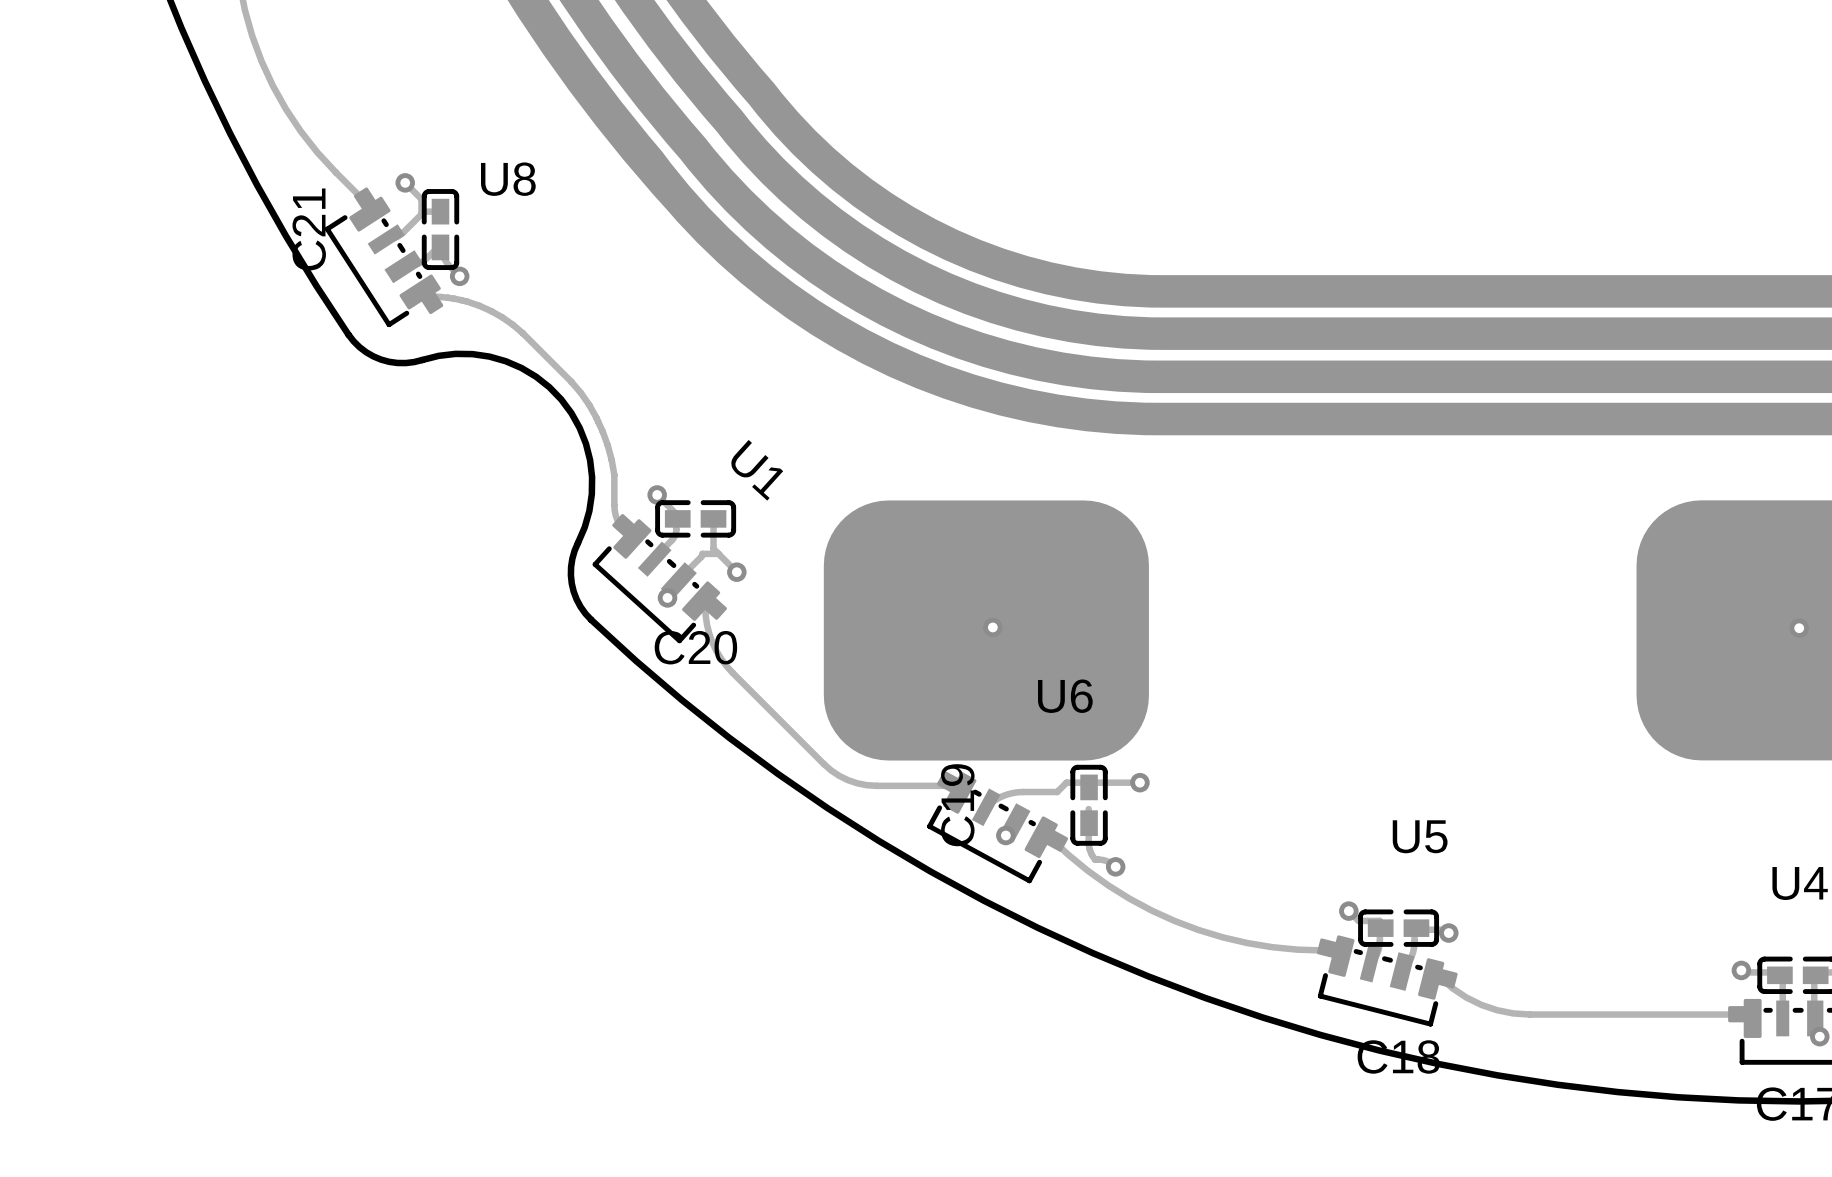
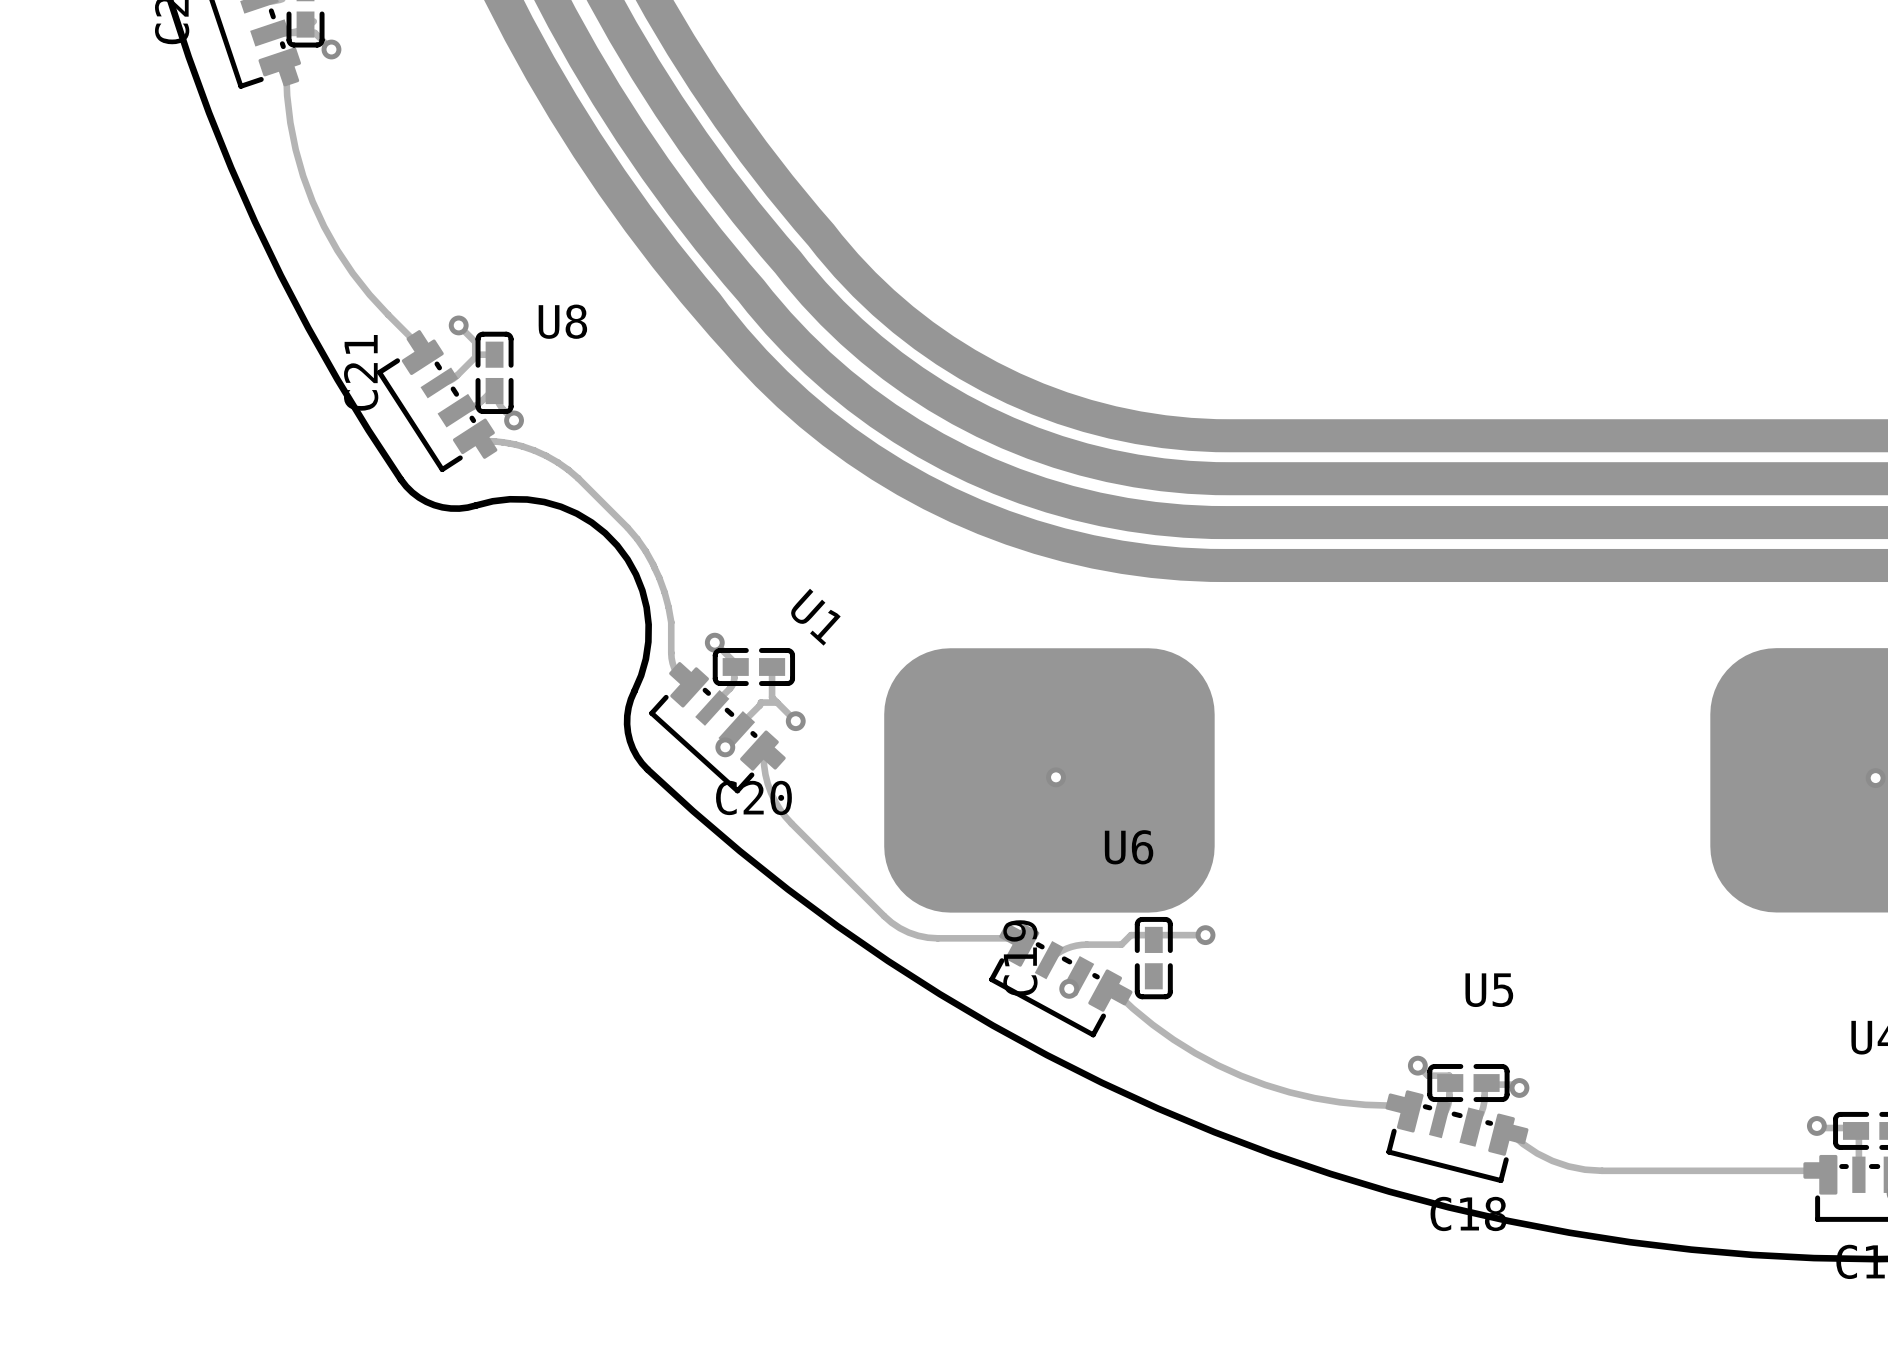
track: (1088, 809) (1088, 844) (1091, 854) (1094, 859) (1107, 861) (1115, 866) -> none
via: (1115, 866) -> none

